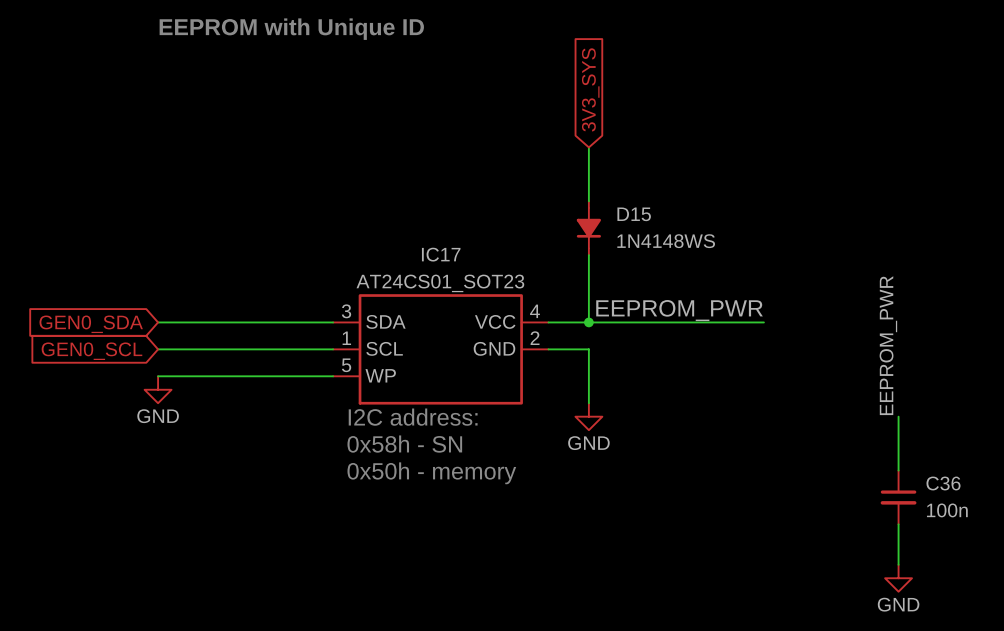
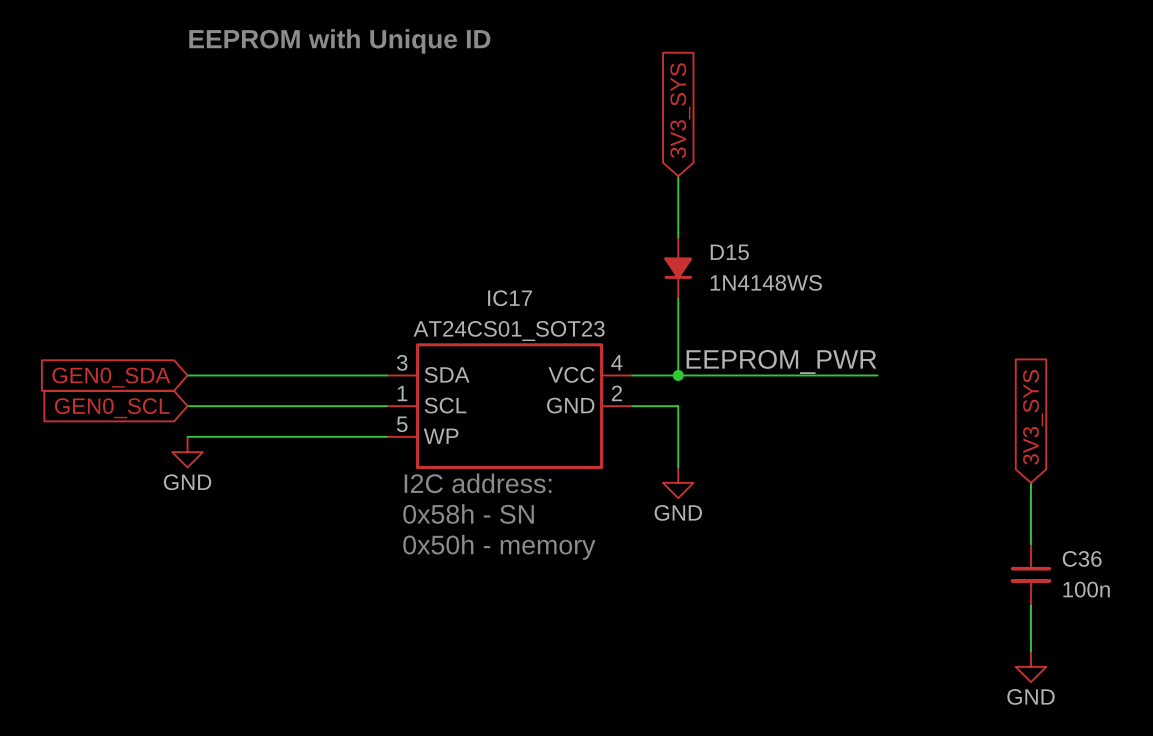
label: EEPROM_PWR (888, 345) -> none
global label: none -> 3V3_SYS (1033, 417)

